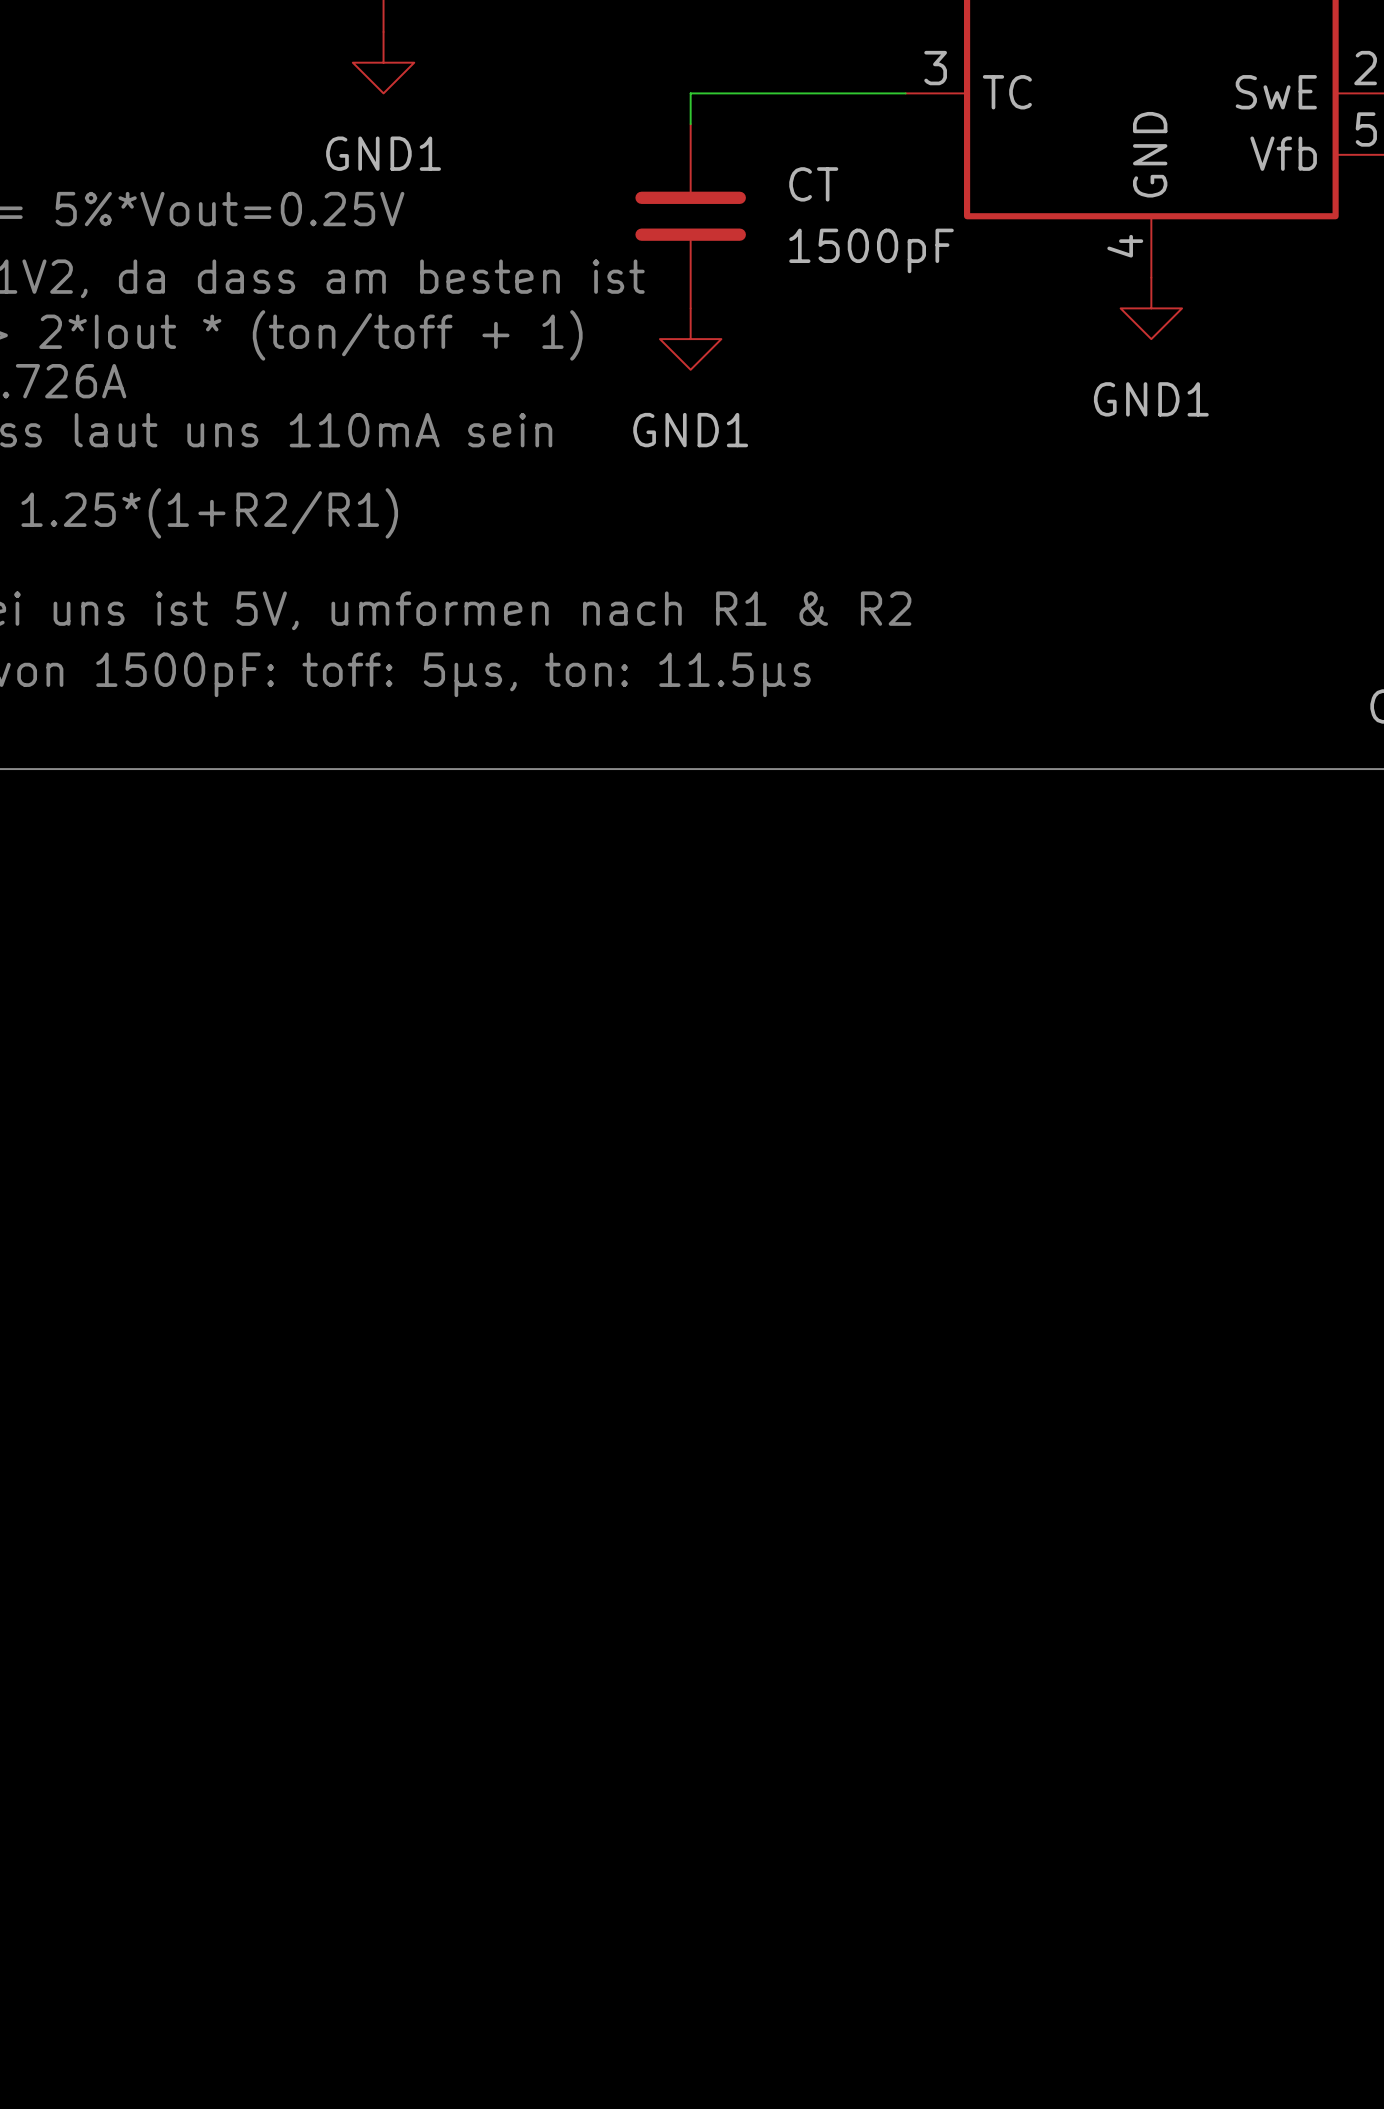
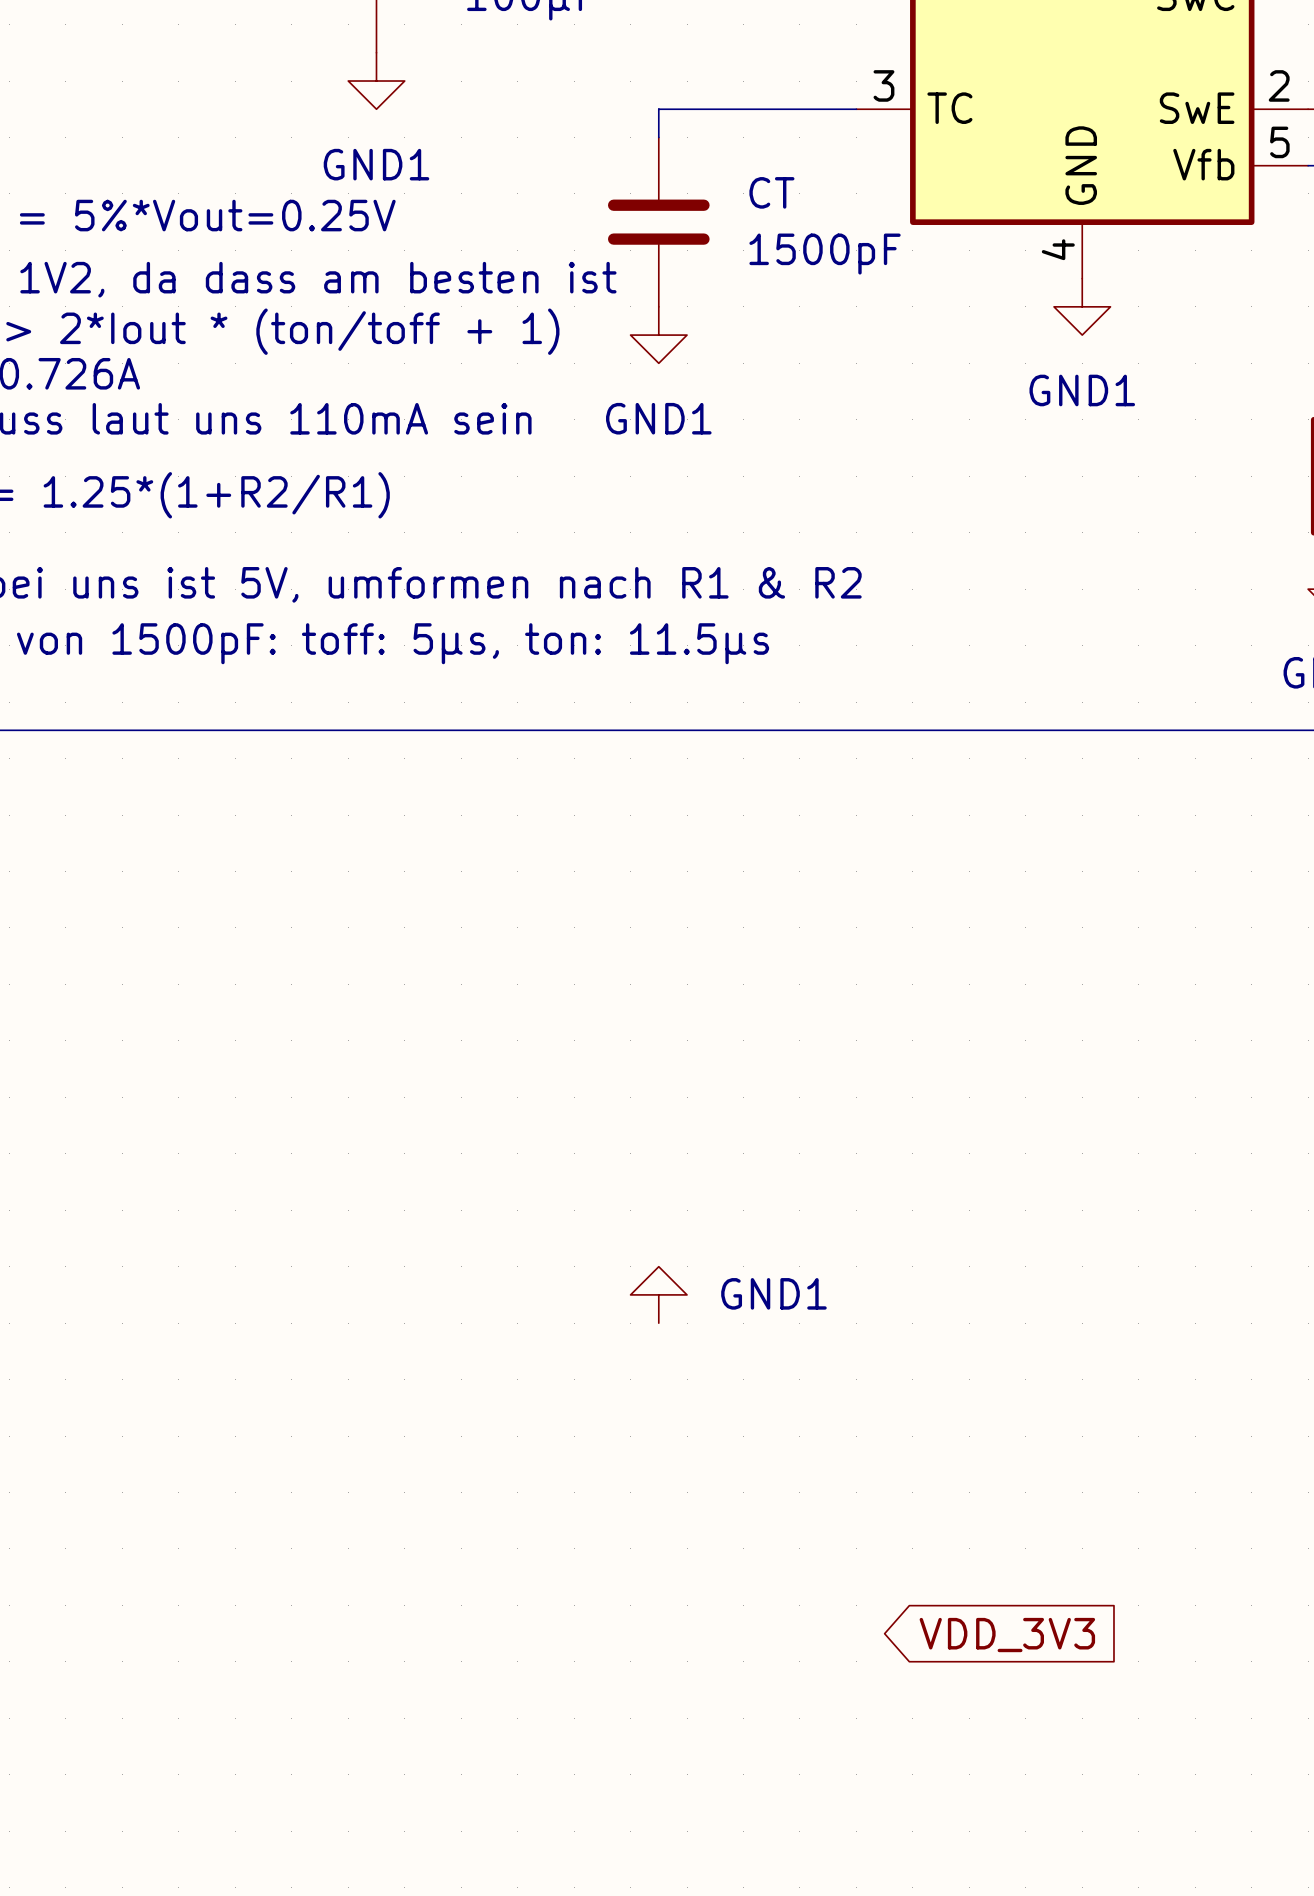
power symbol: none -> GND1 (658, 1294)
global label: none -> VDD_3V3 (1007, 1635)

